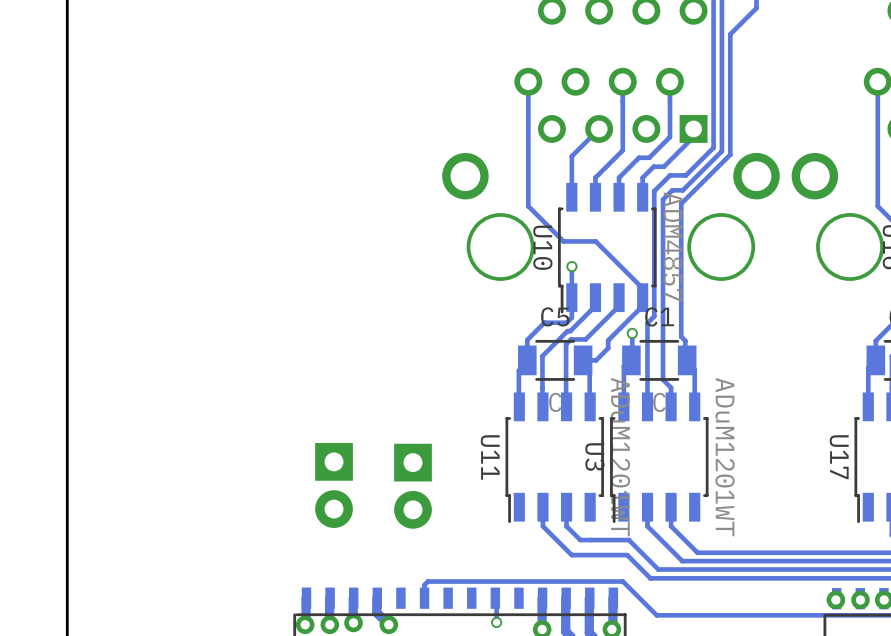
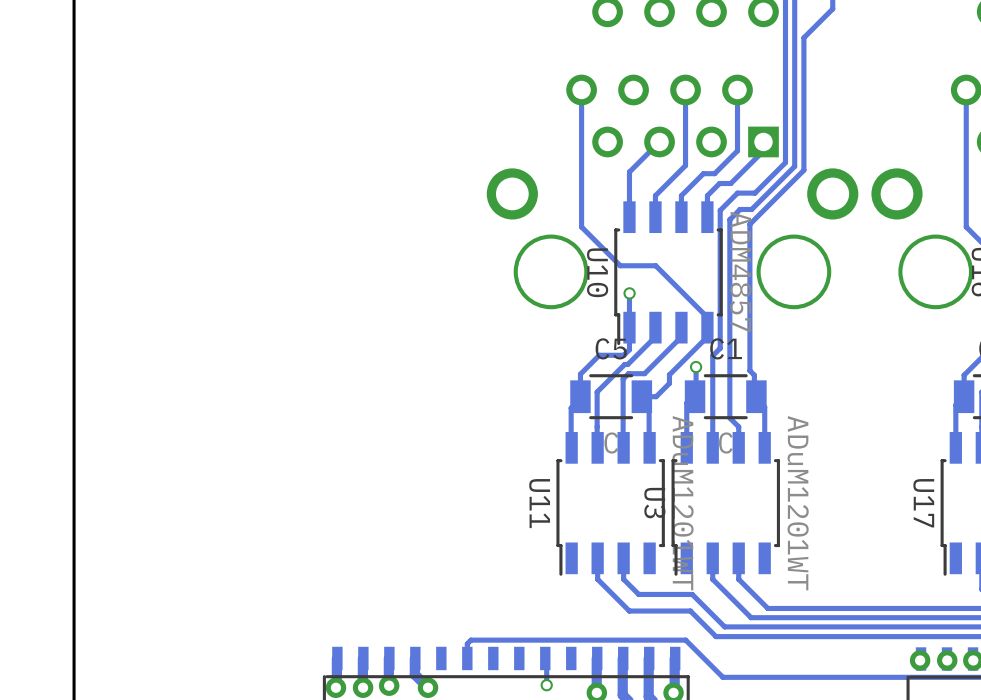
part: (334, 485) -> none
part: (413, 486) -> none

